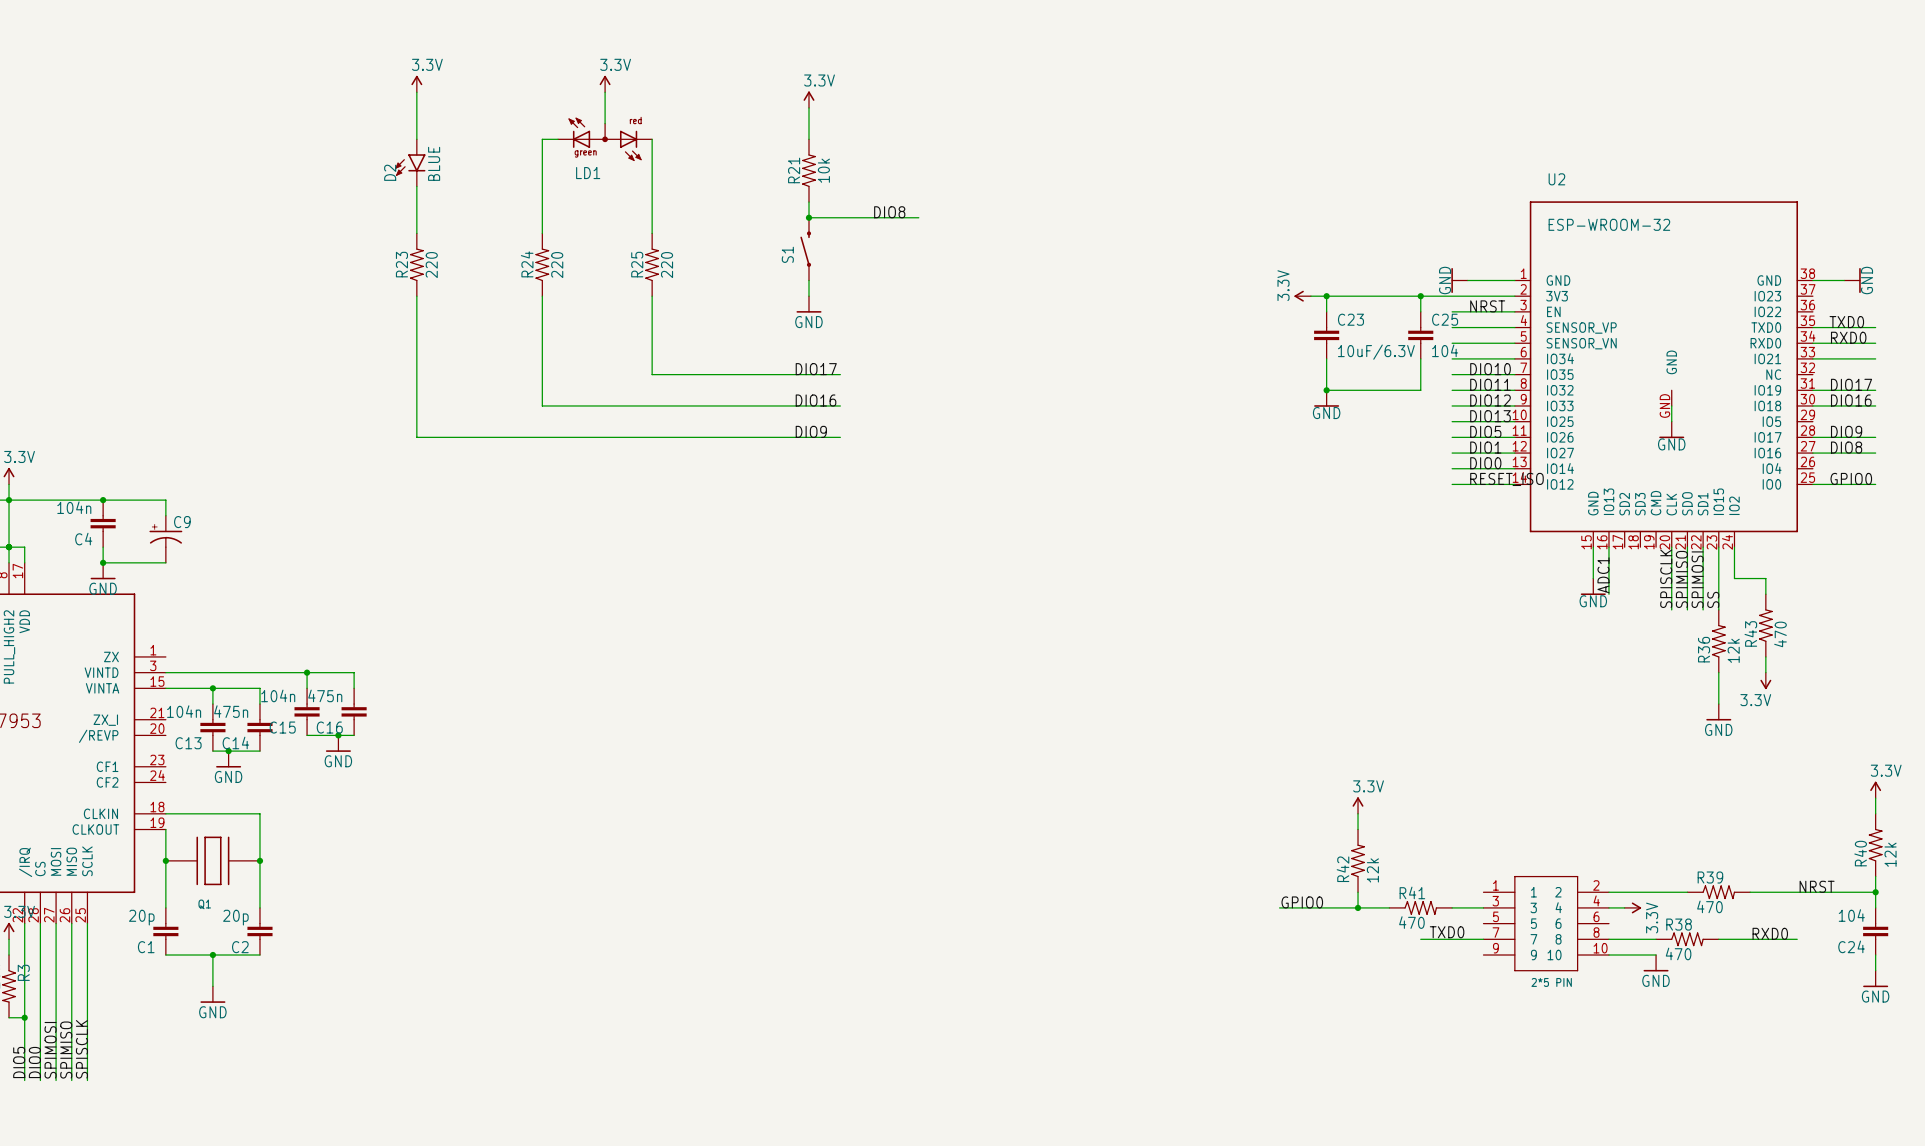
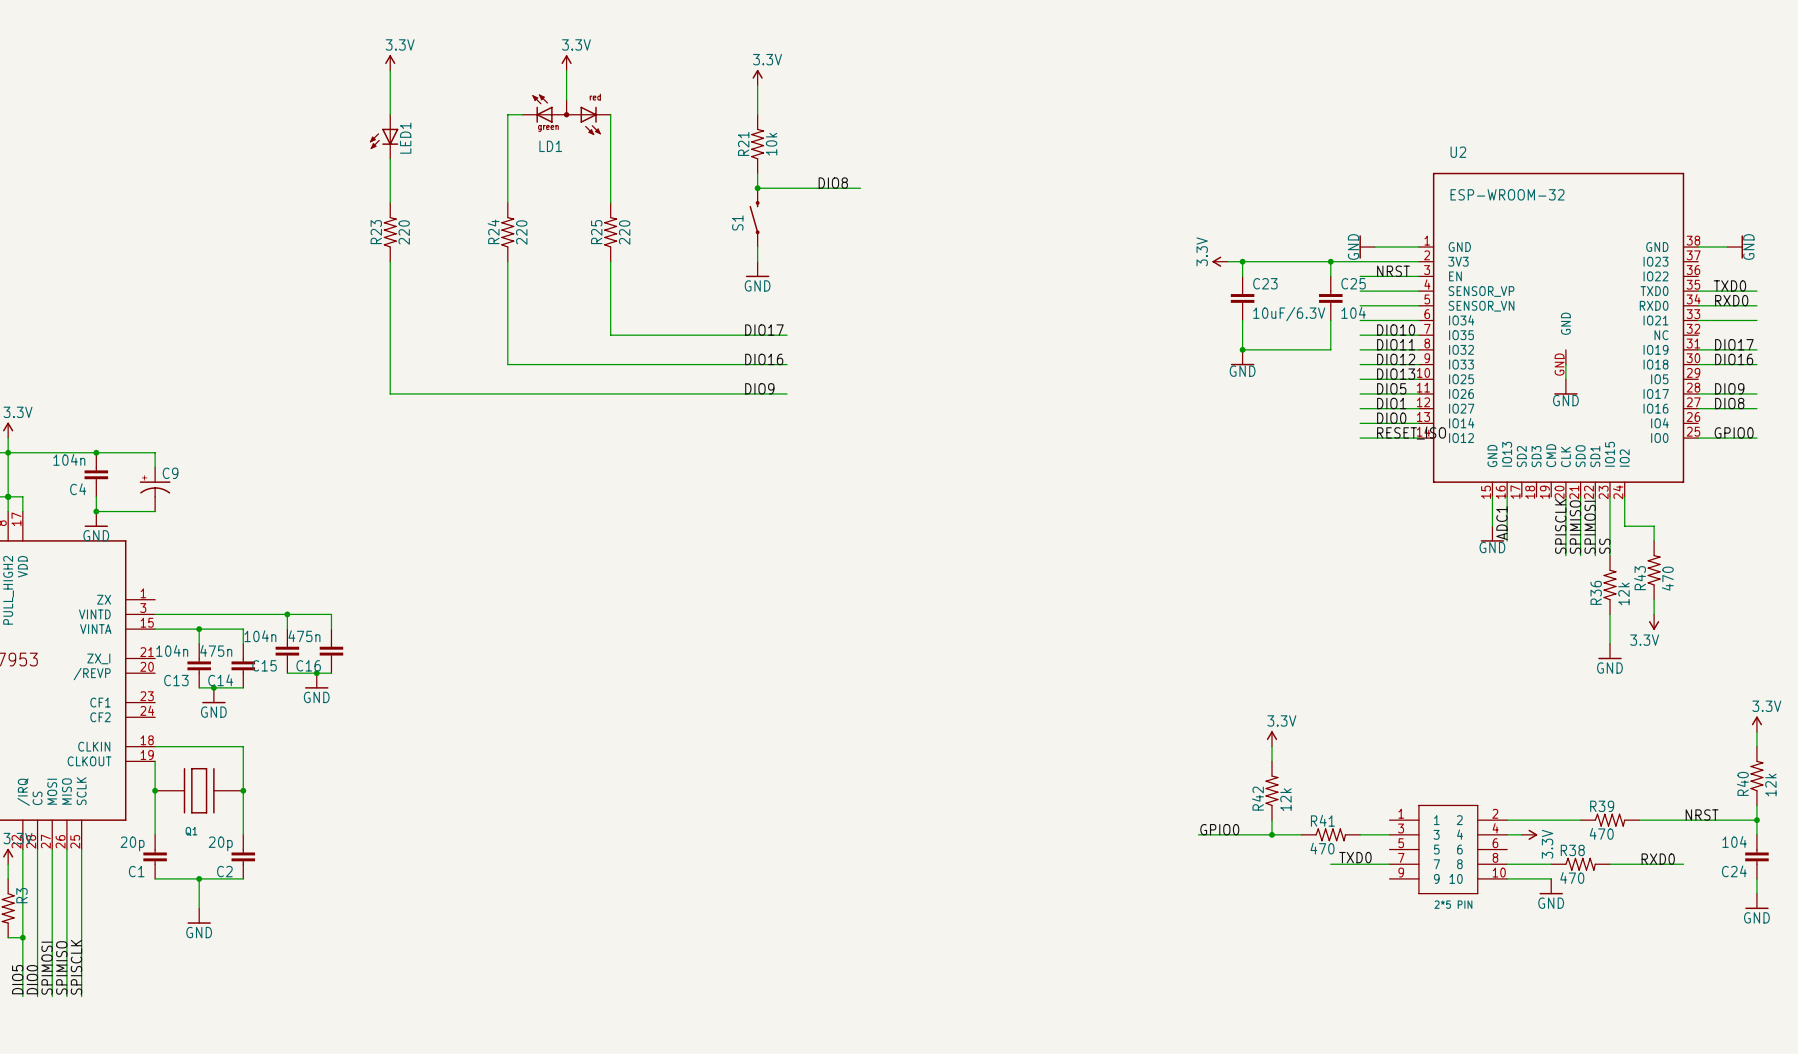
D2: BLUE (410, 162) -> none
LED1: none -> (384, 136)

